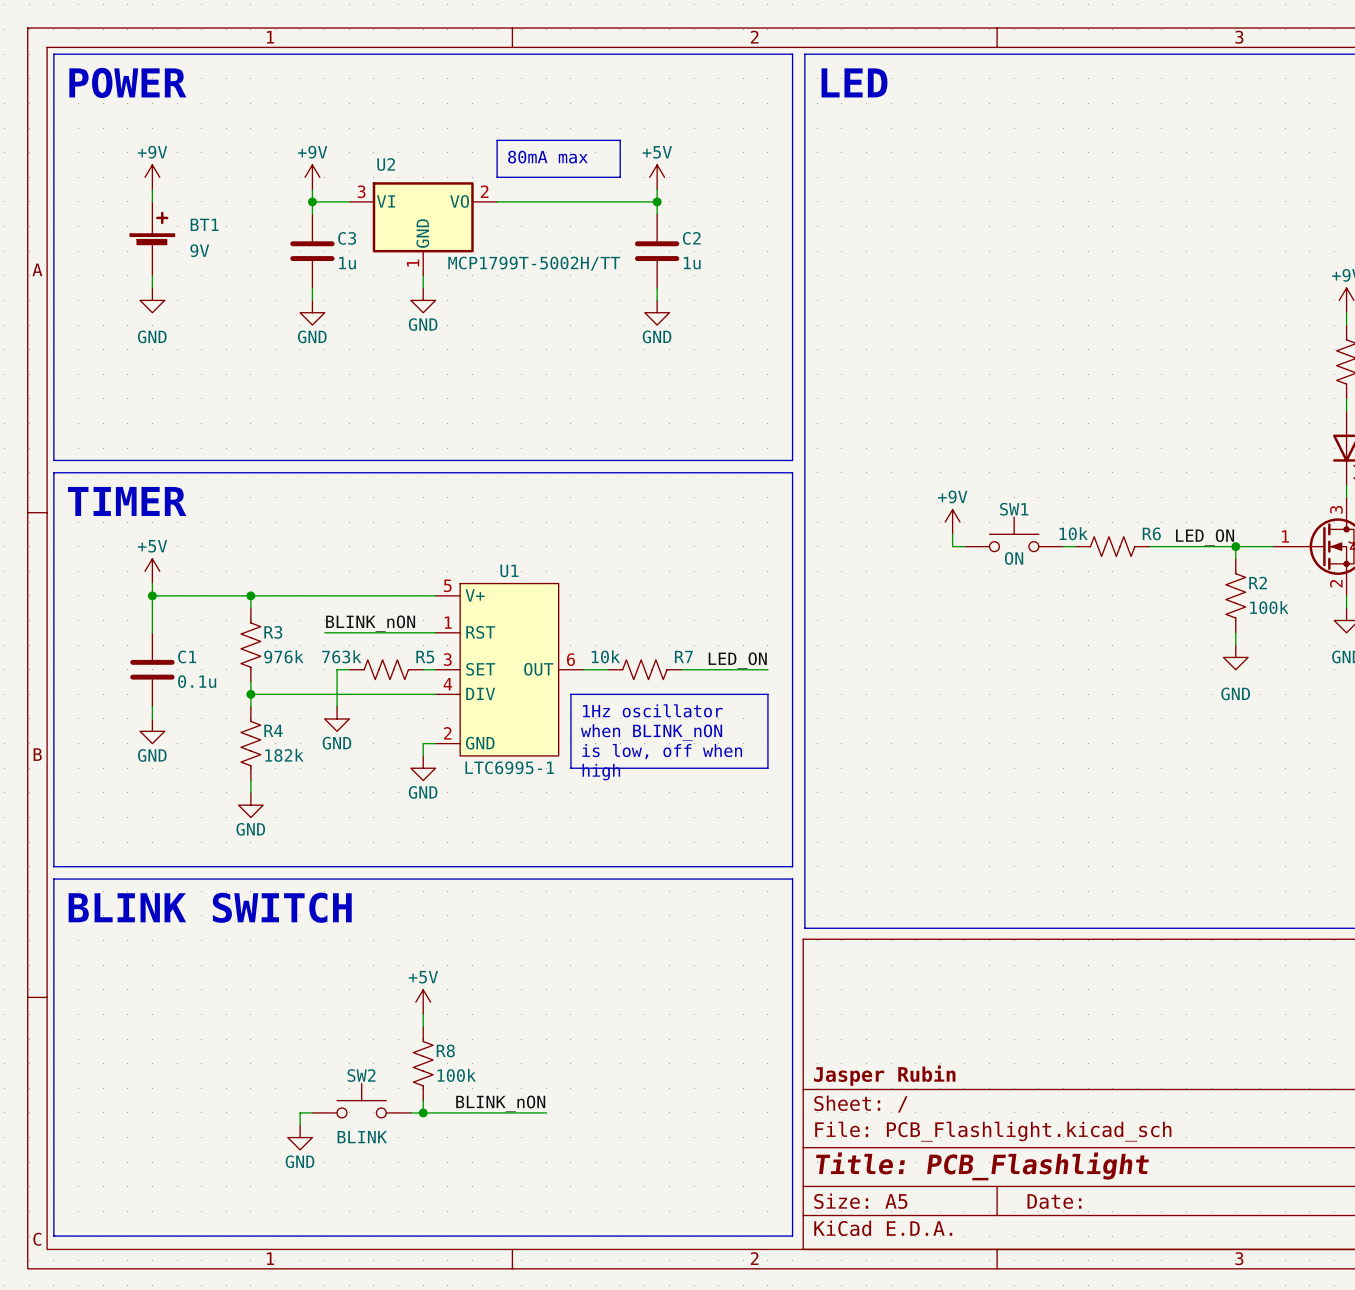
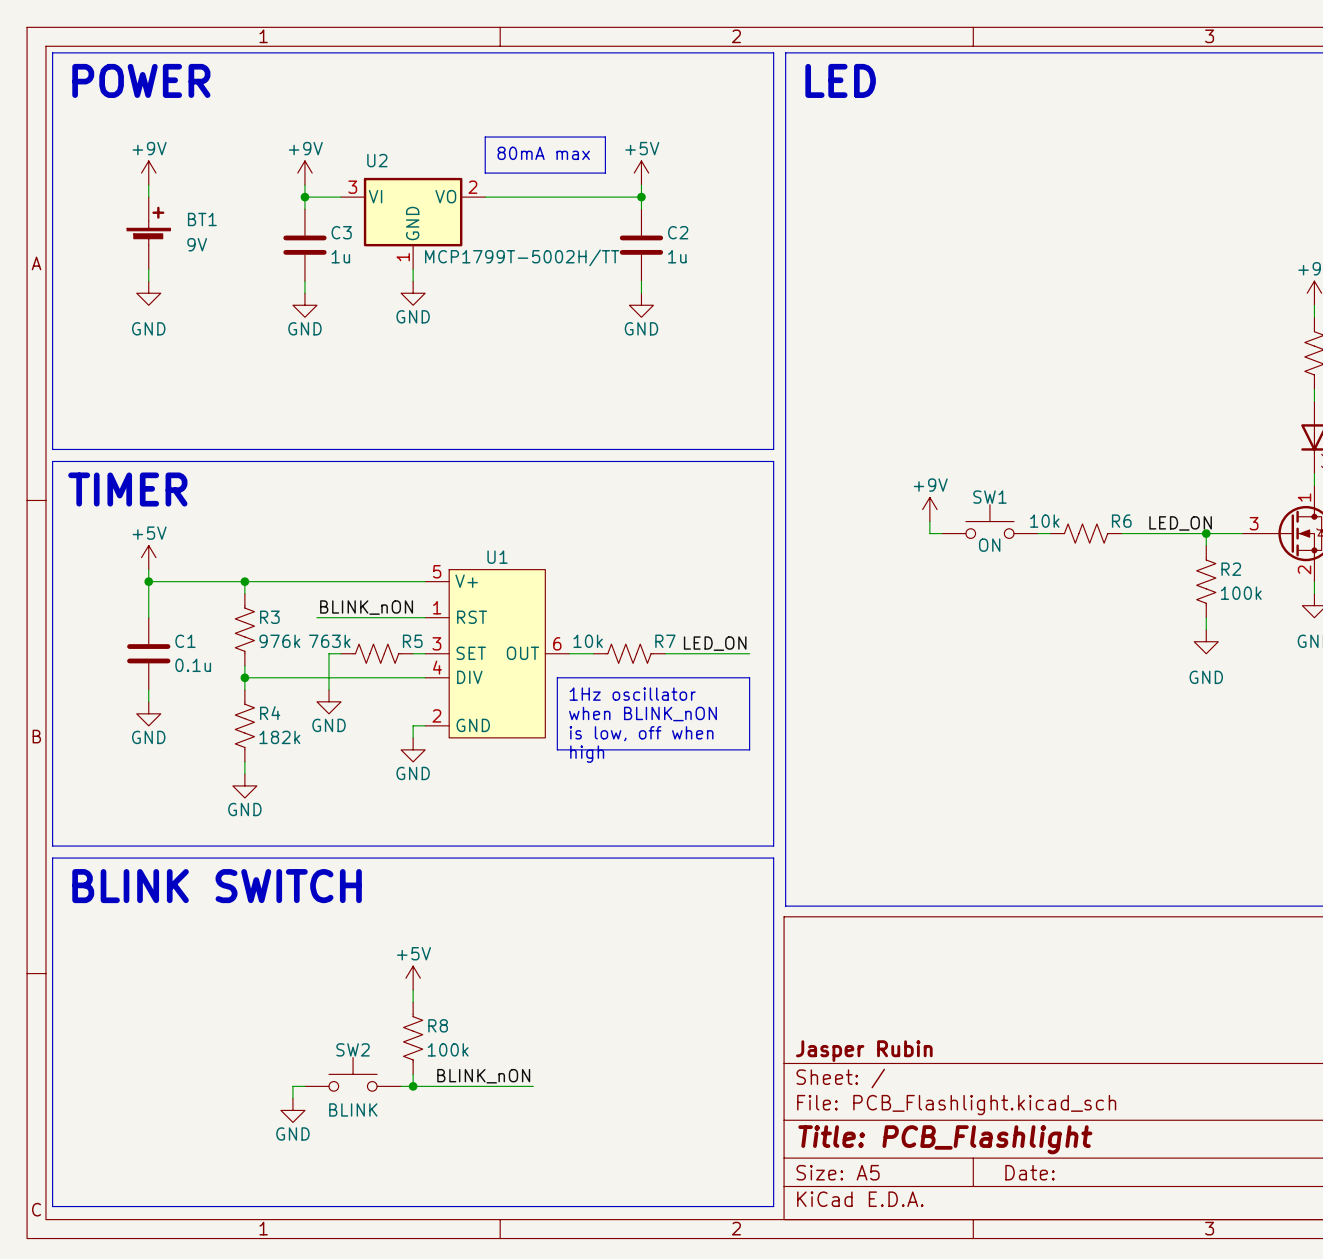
part pin number: 3 (1336, 509) -> 1 (1304, 497)
part pin number: 1 (1285, 536) -> 3 (1254, 523)
U1 value: LTC6995-1 (509, 767) -> none

